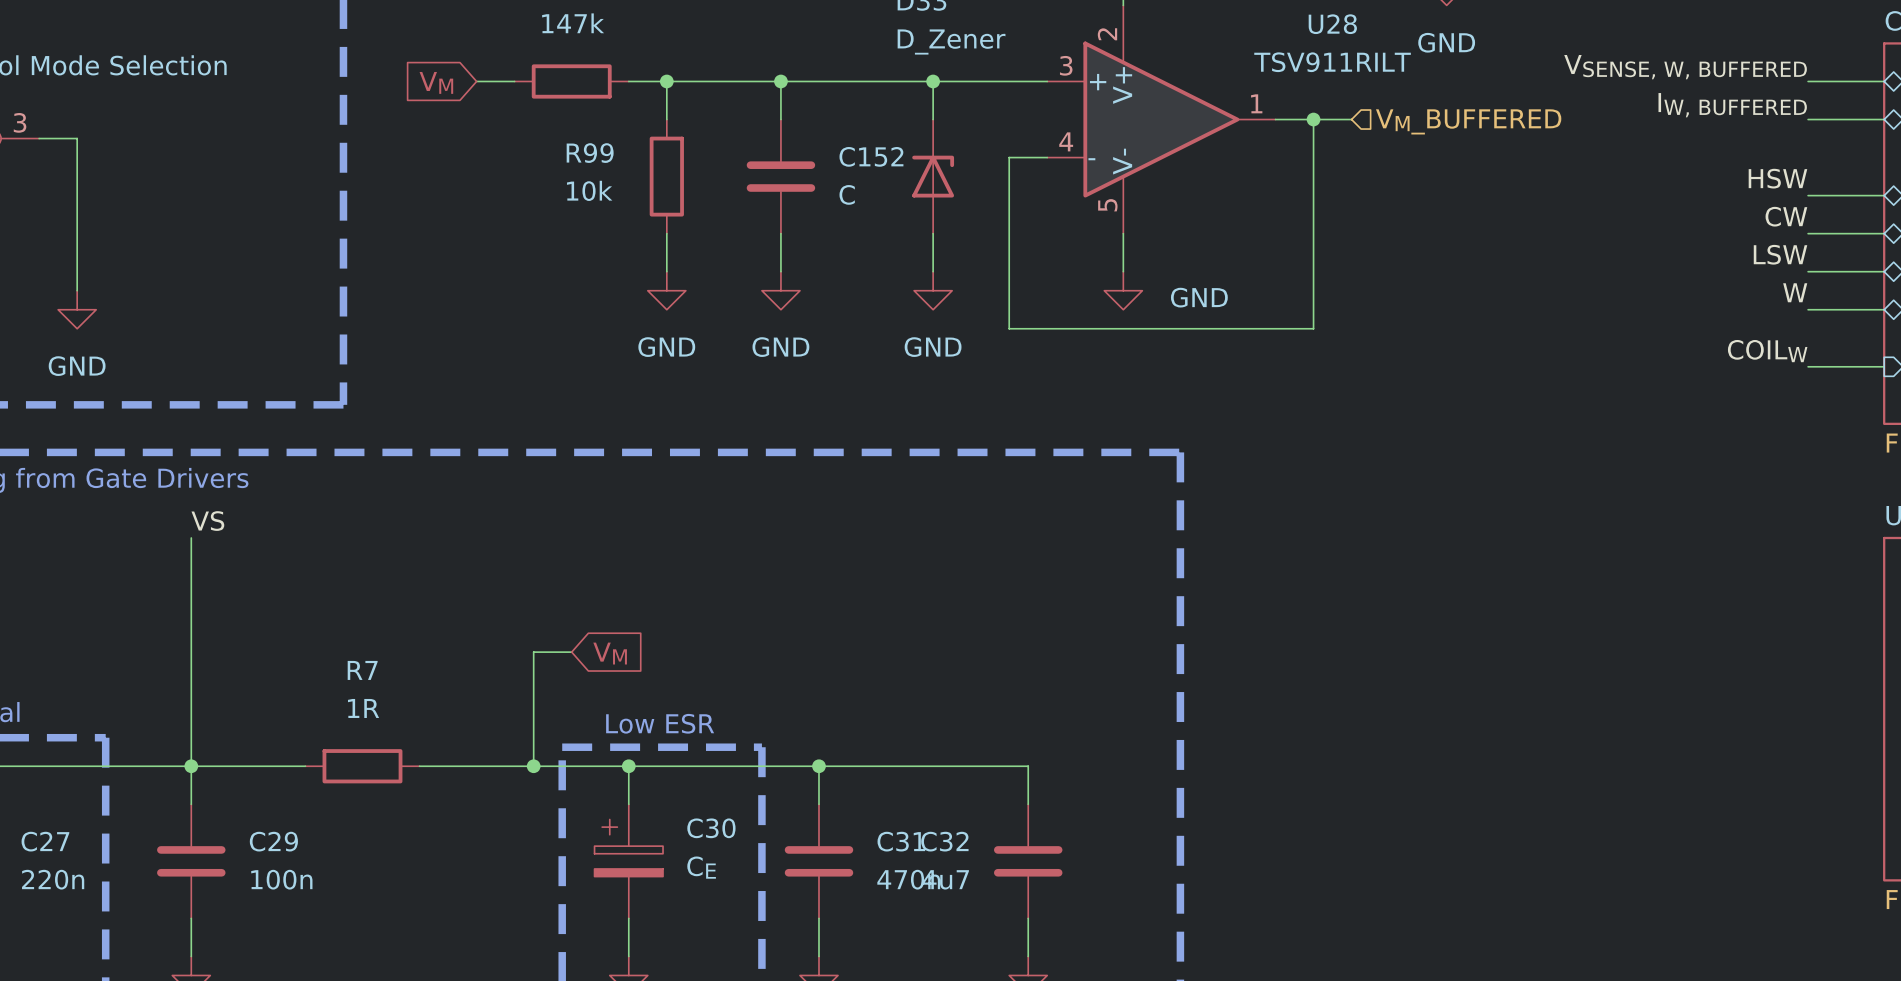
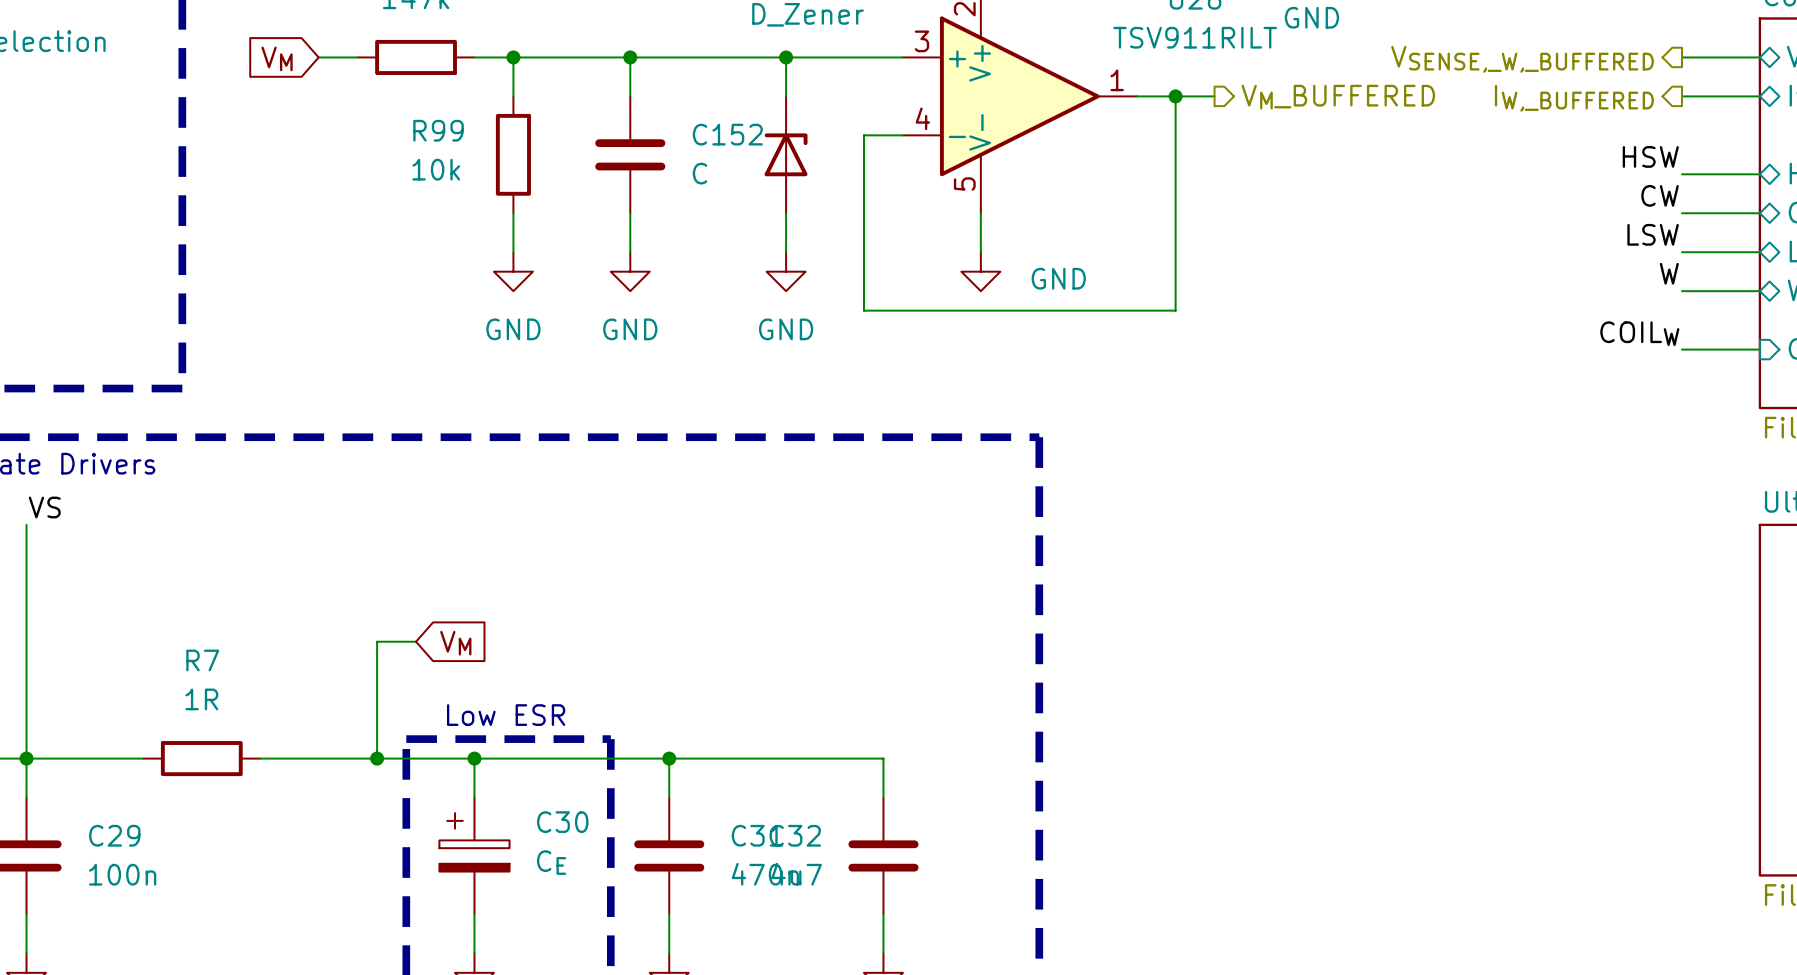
label: VSENSE, W, BUFFERED (1685, 67) -> none
hierarchical label: none -> VSENSE,_W,_BUFFERED (1522, 59)
label: IW, BUFFERED (1732, 105) -> none
hierarchical label shape: input (1468, 121) -> output (1338, 97)
hierarchical label: none -> IW,_BUFFERED (1574, 98)

